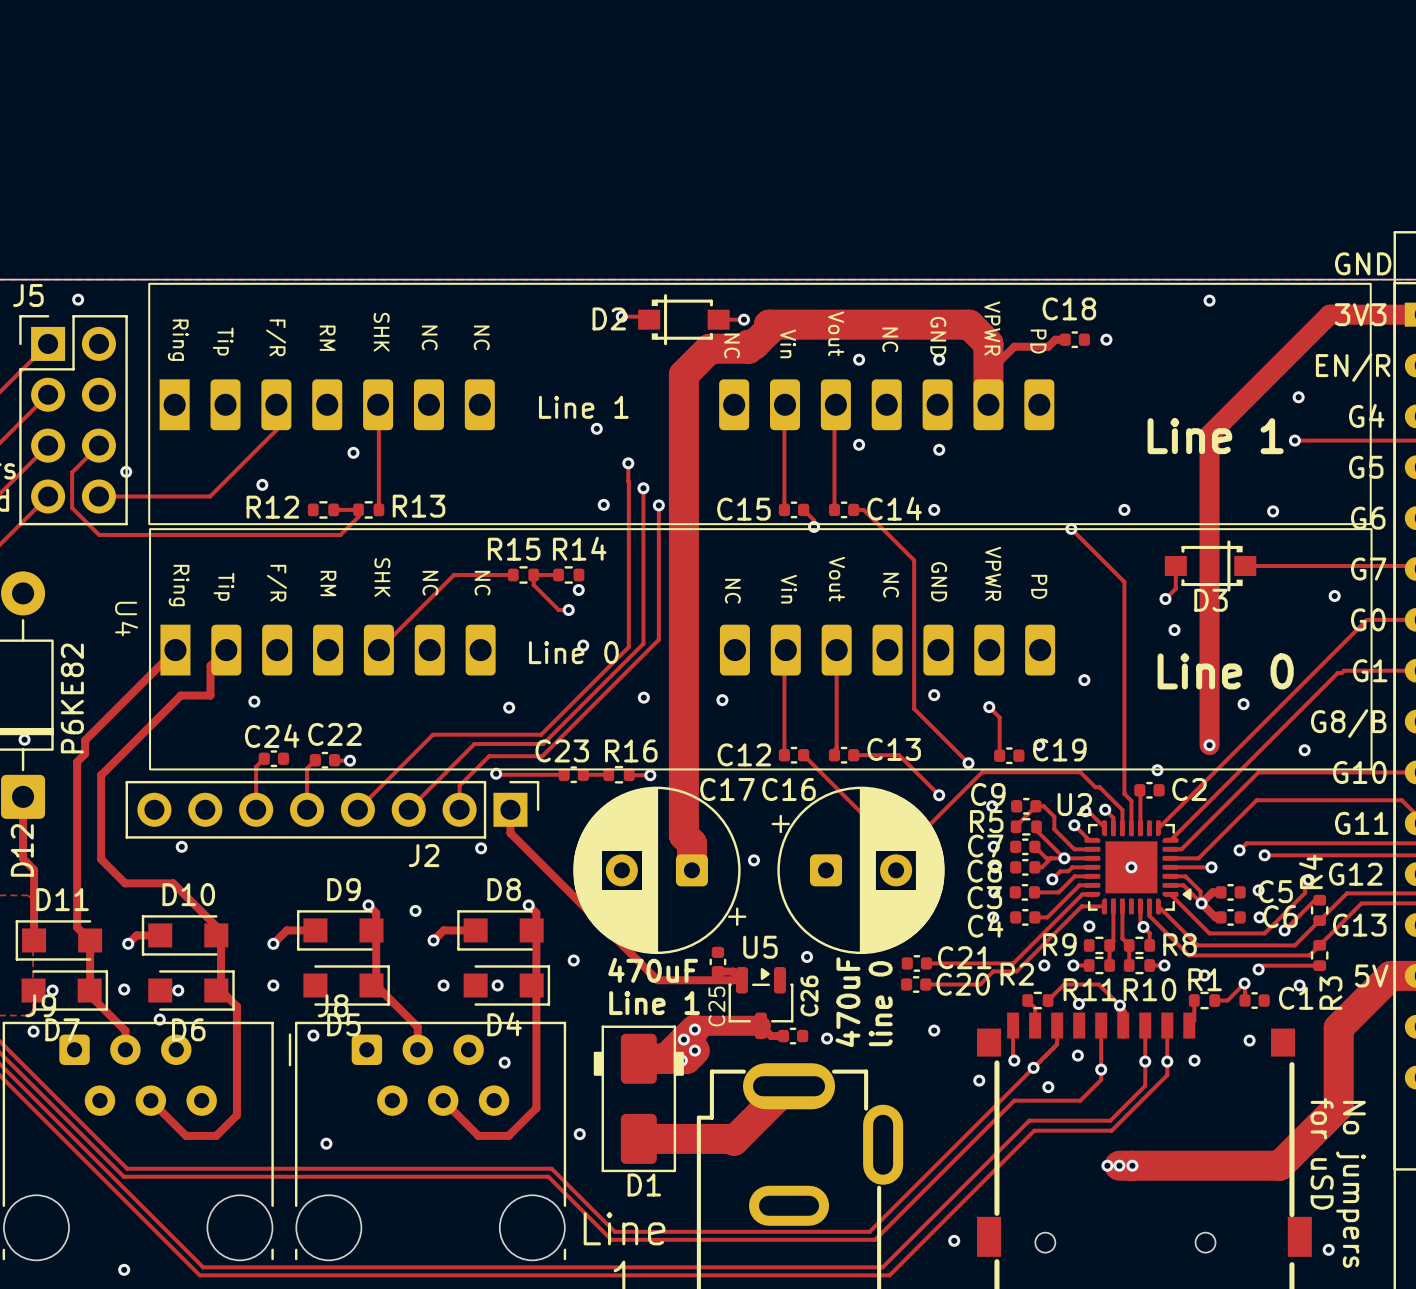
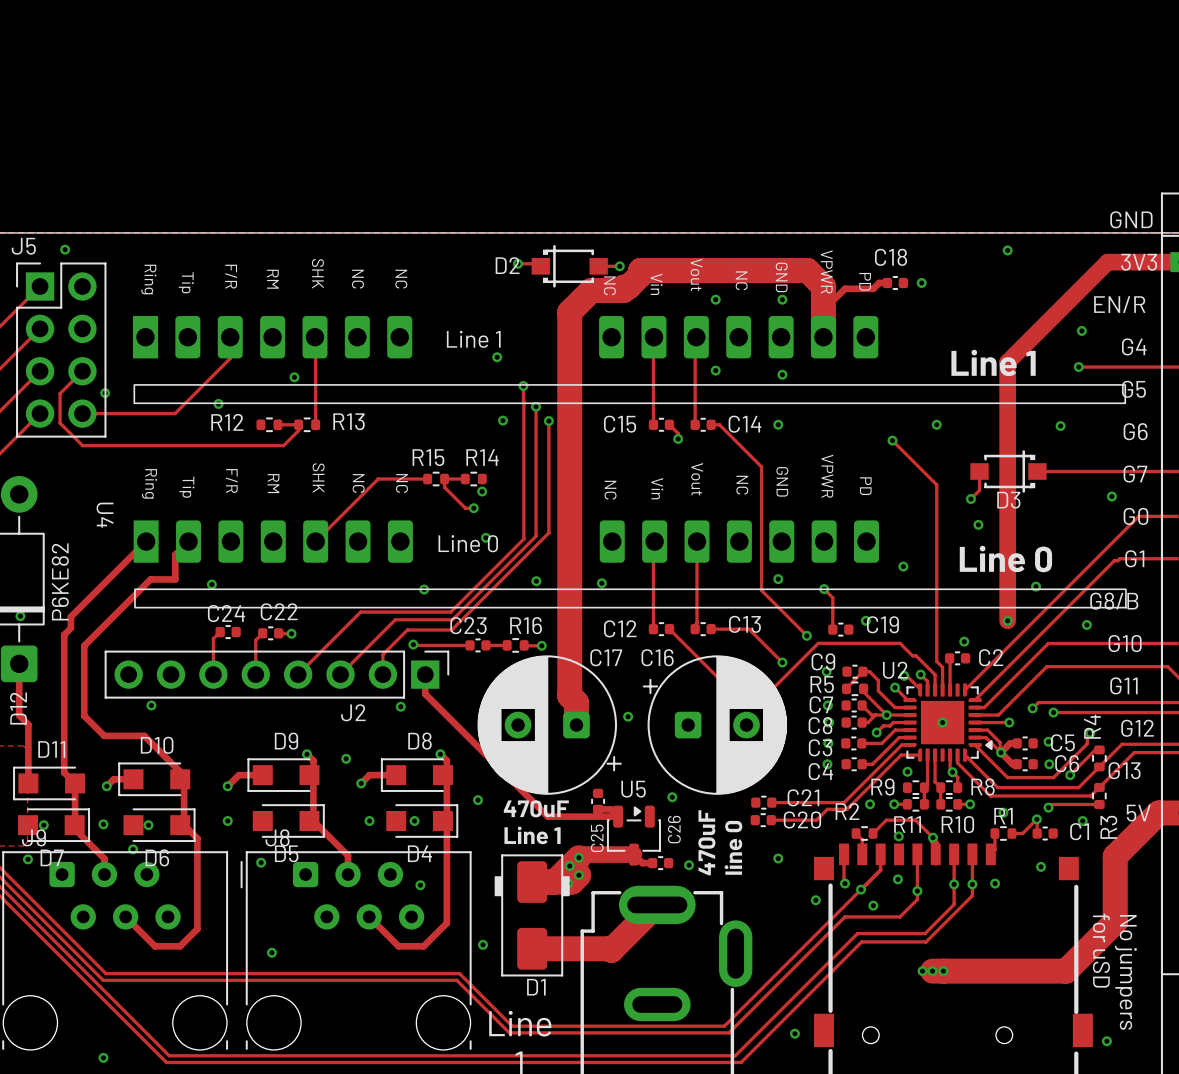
part: (759, 403) -> none
part: none -> (629, 360)
U4 footprint: [149, 528, 1373, 771] -> [133, 520, 1127, 609]

